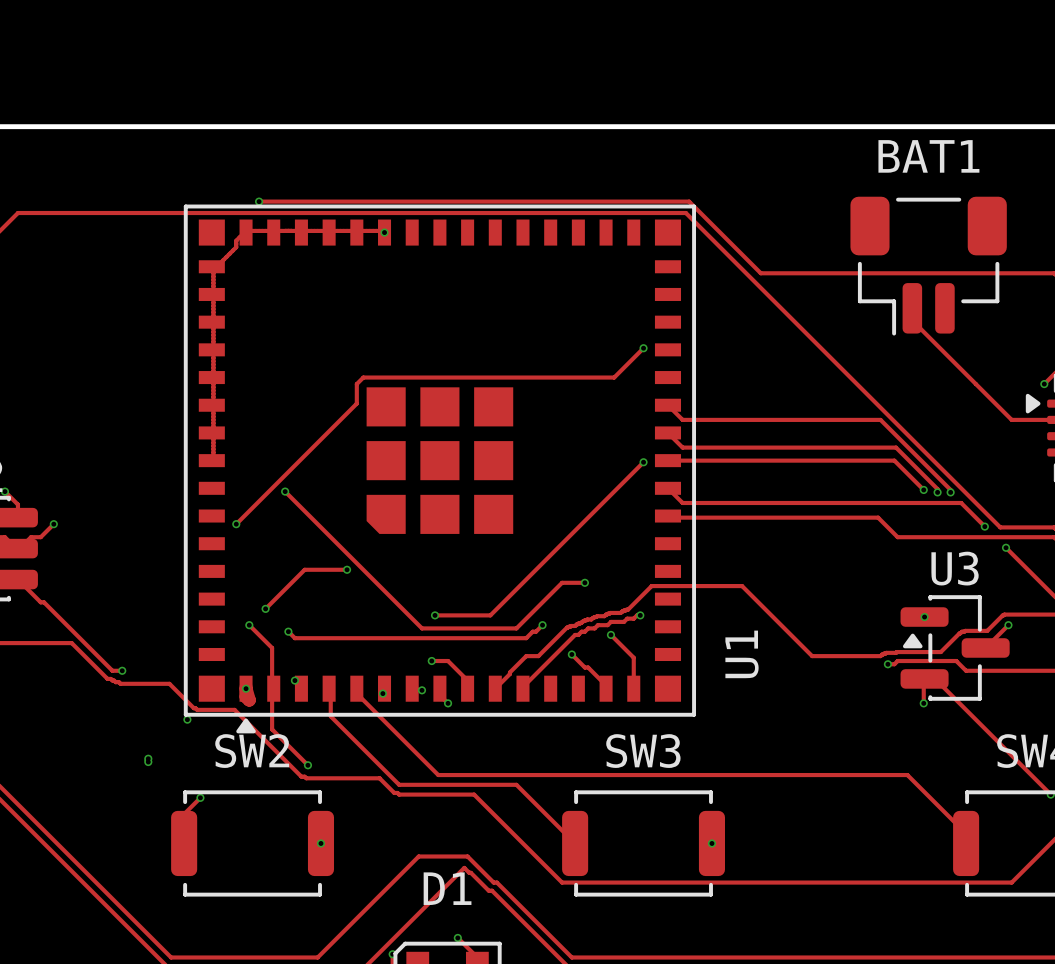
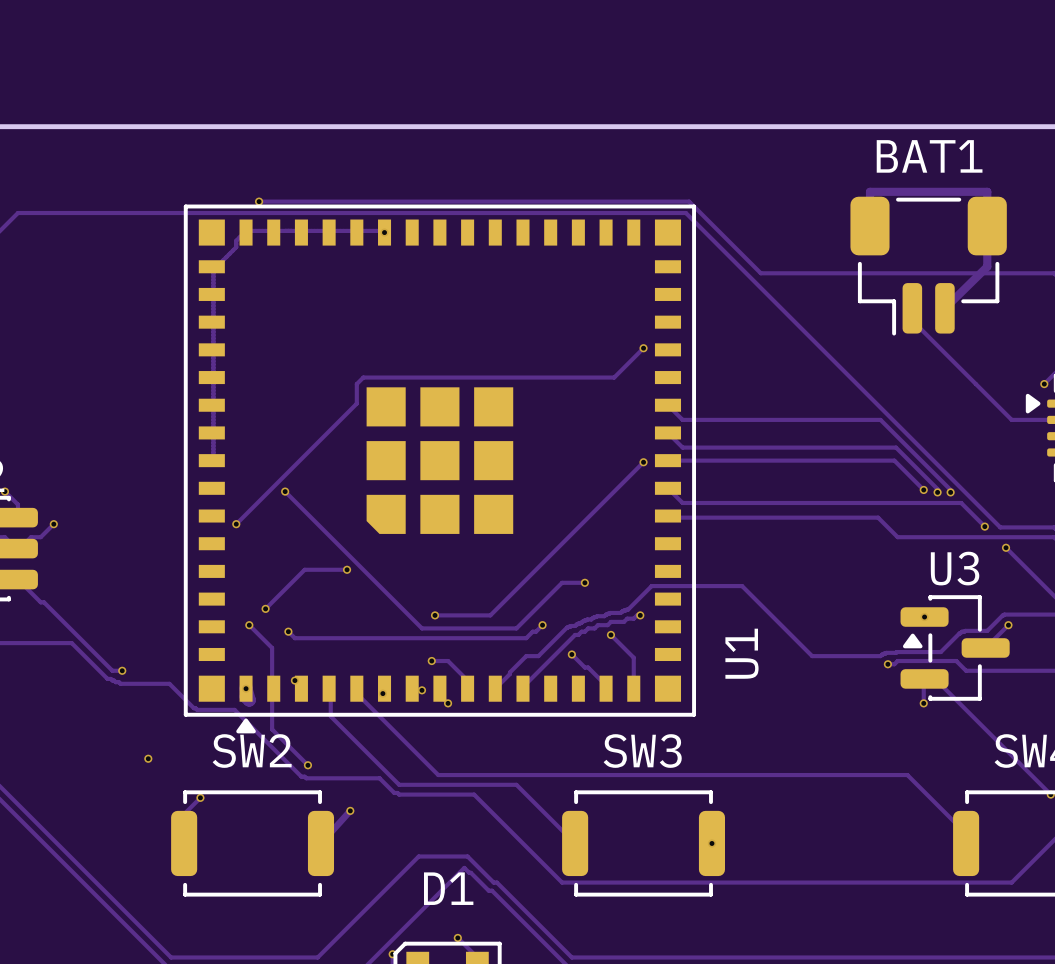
track: none -> (869, 226) (869, 191) (987, 191) (987, 266) (944, 308)
via: (187, 719) -> none
via: (148, 762) -> none
track: none -> (350, 810) (320, 843)
via position: (320, 843) -> (350, 810)

